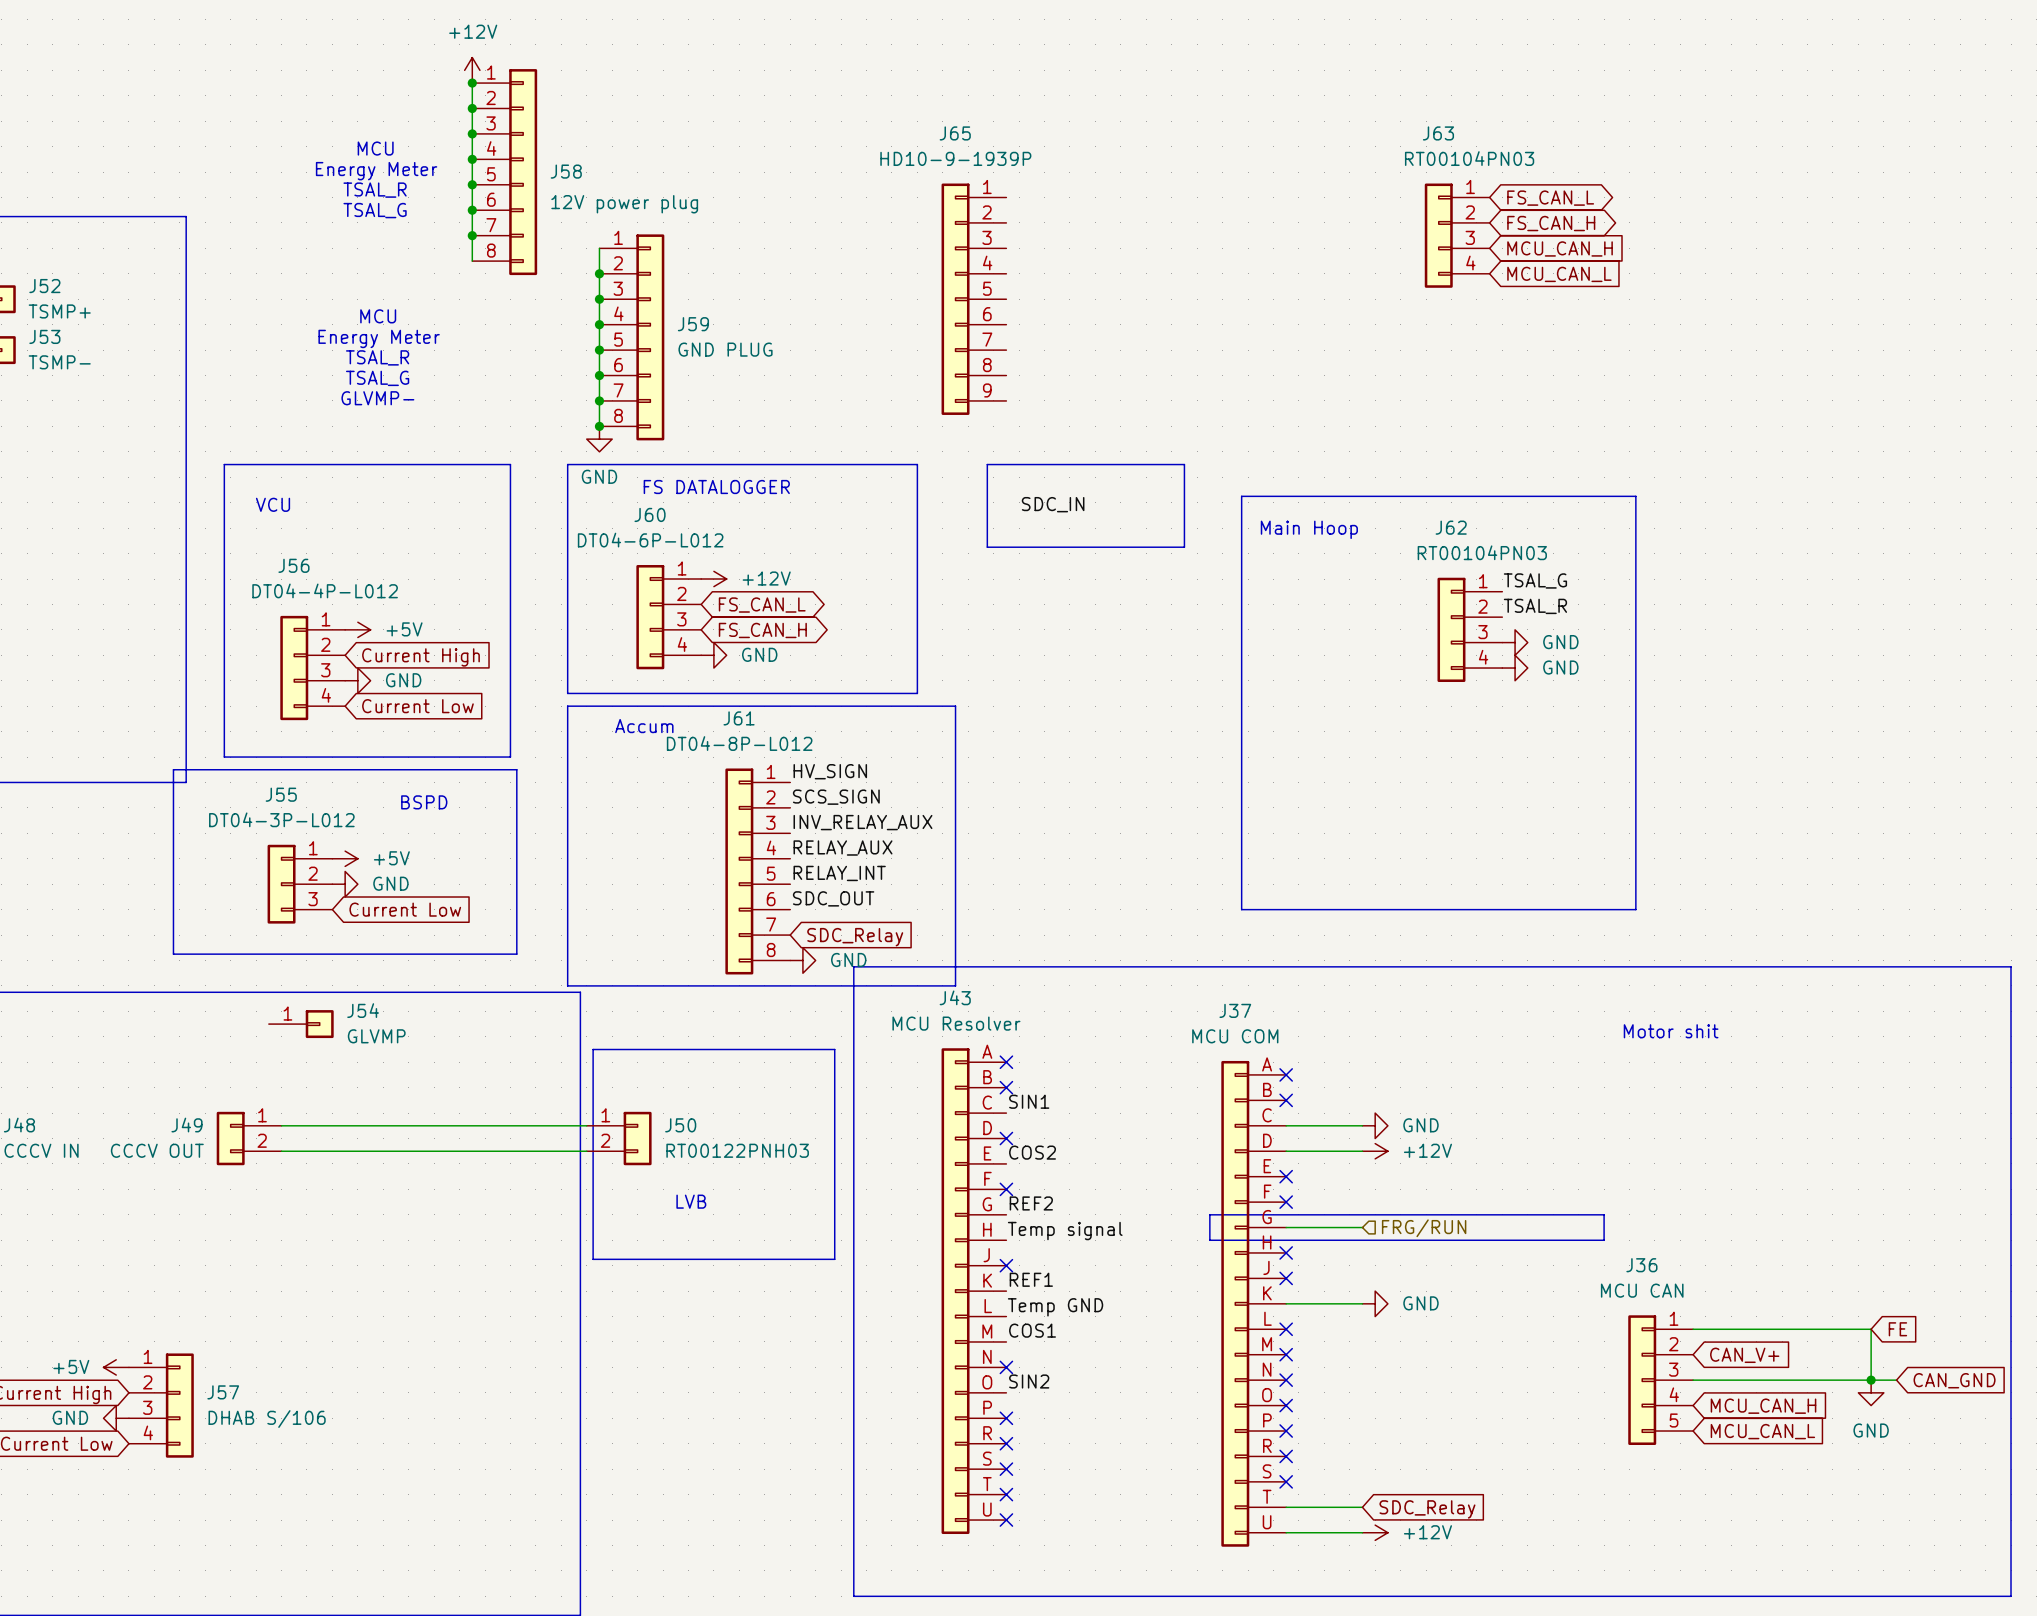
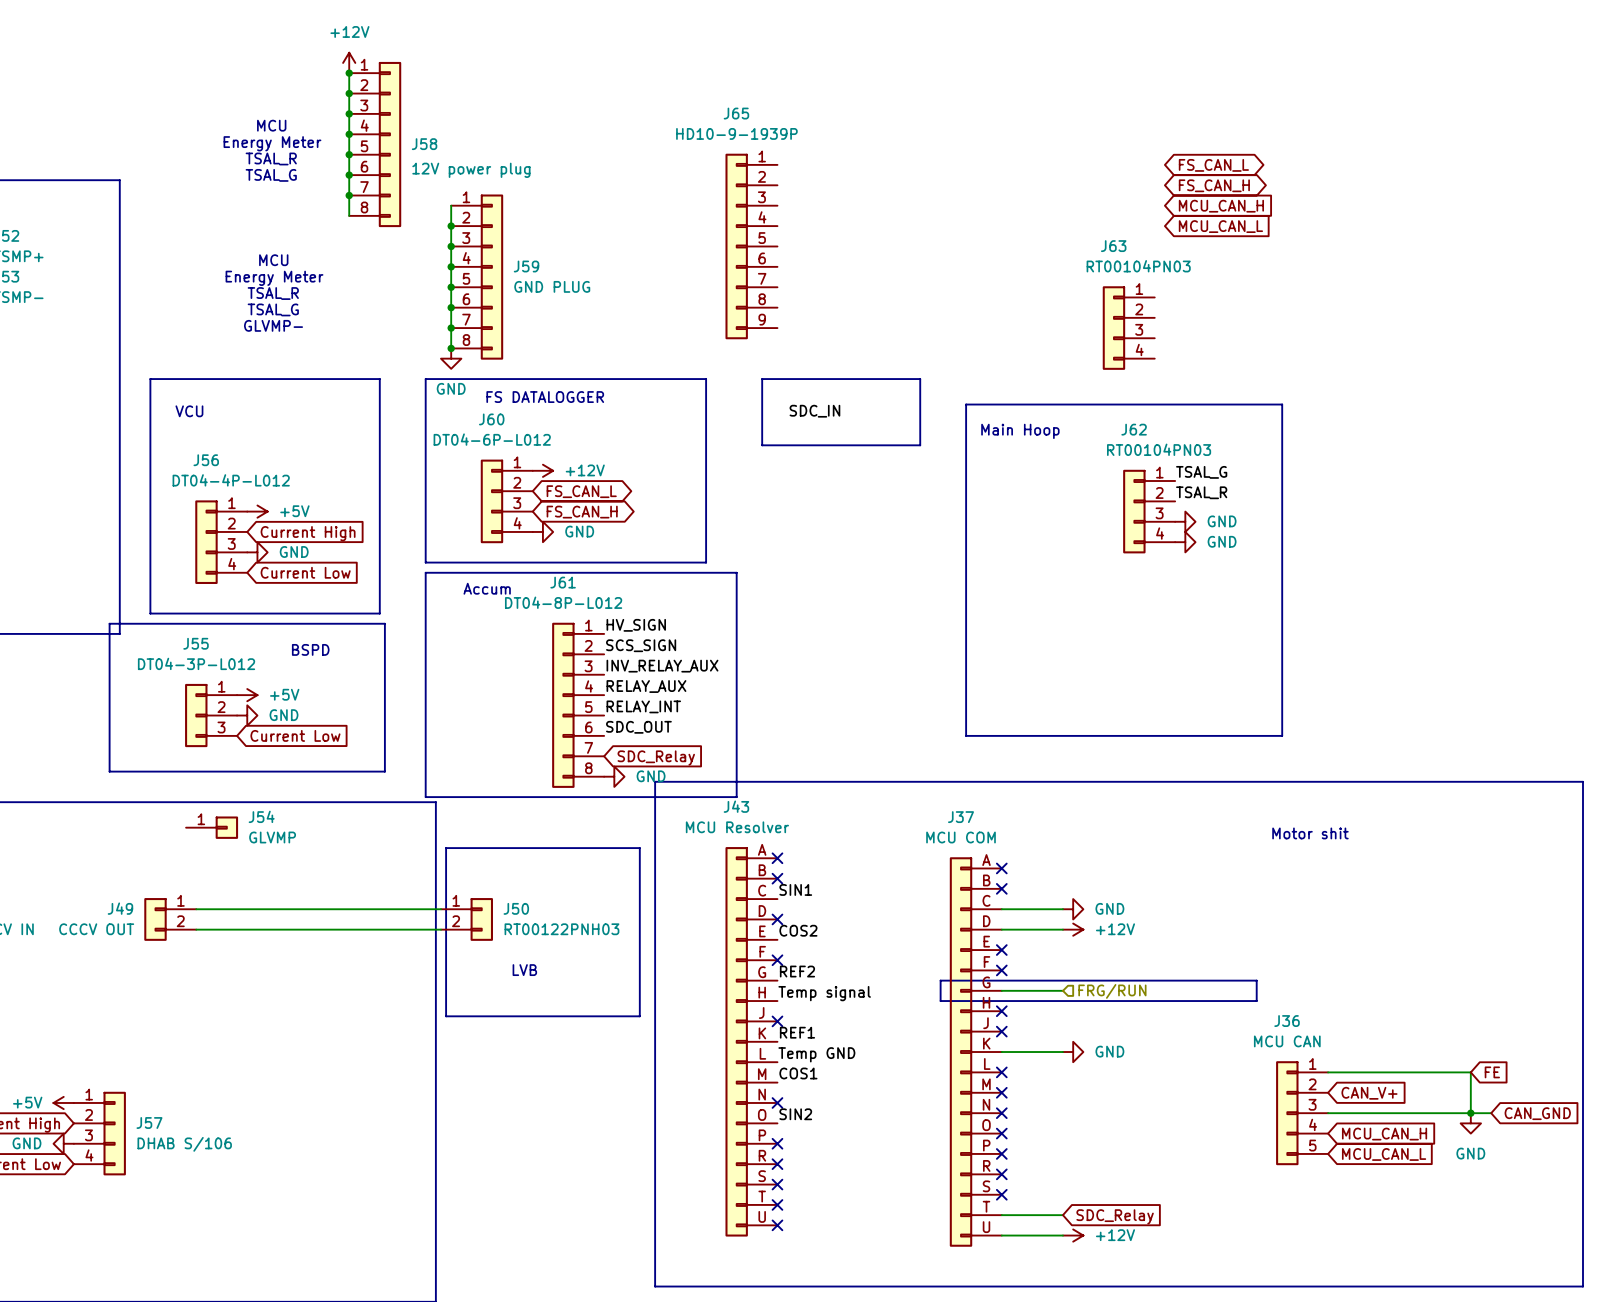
J63 position: (1457, 235) -> (1128, 328)

